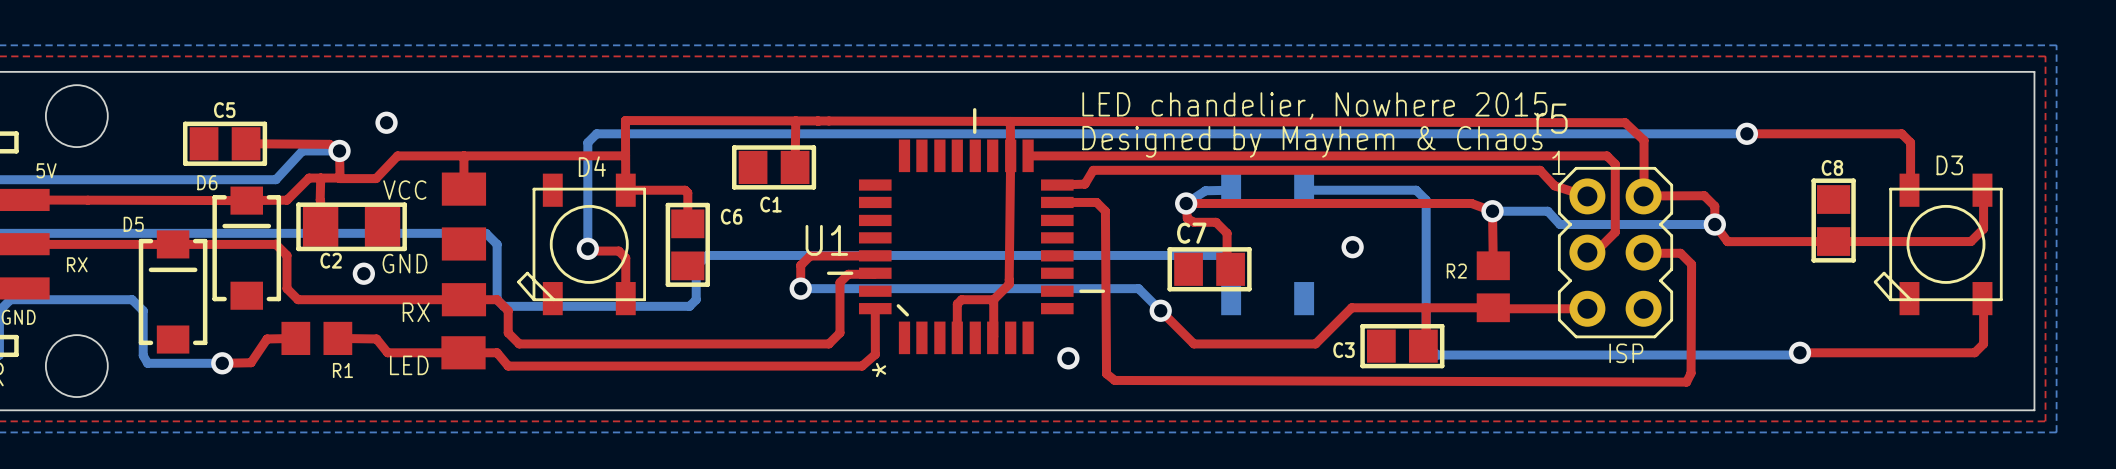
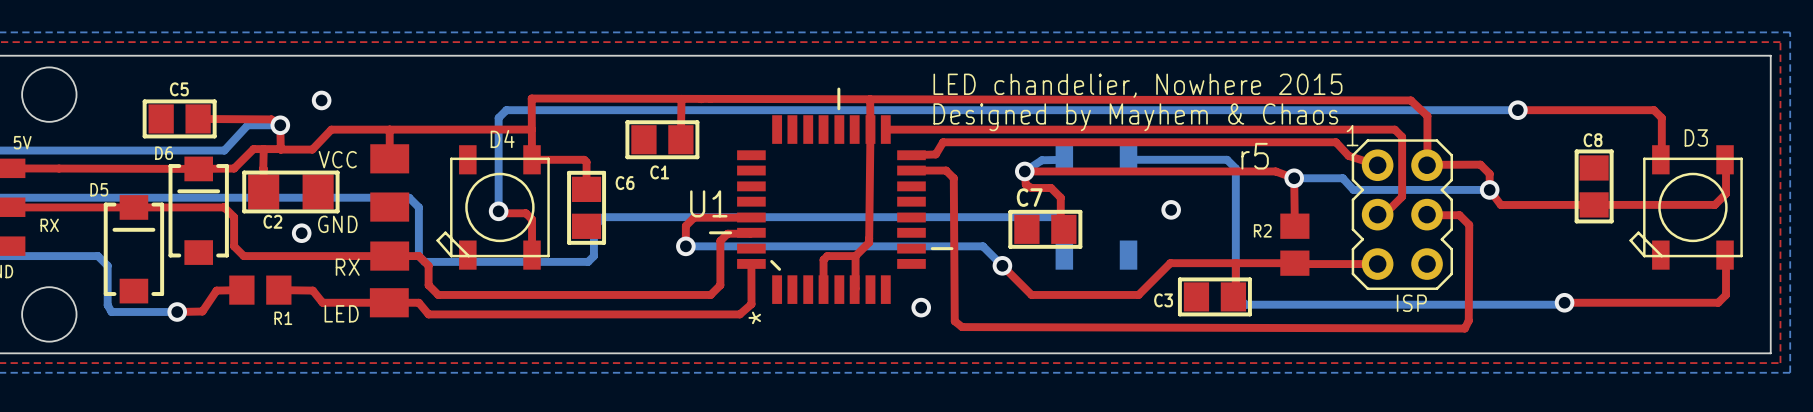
text position: r5 (1552, 118) -> r5 (1255, 156)

